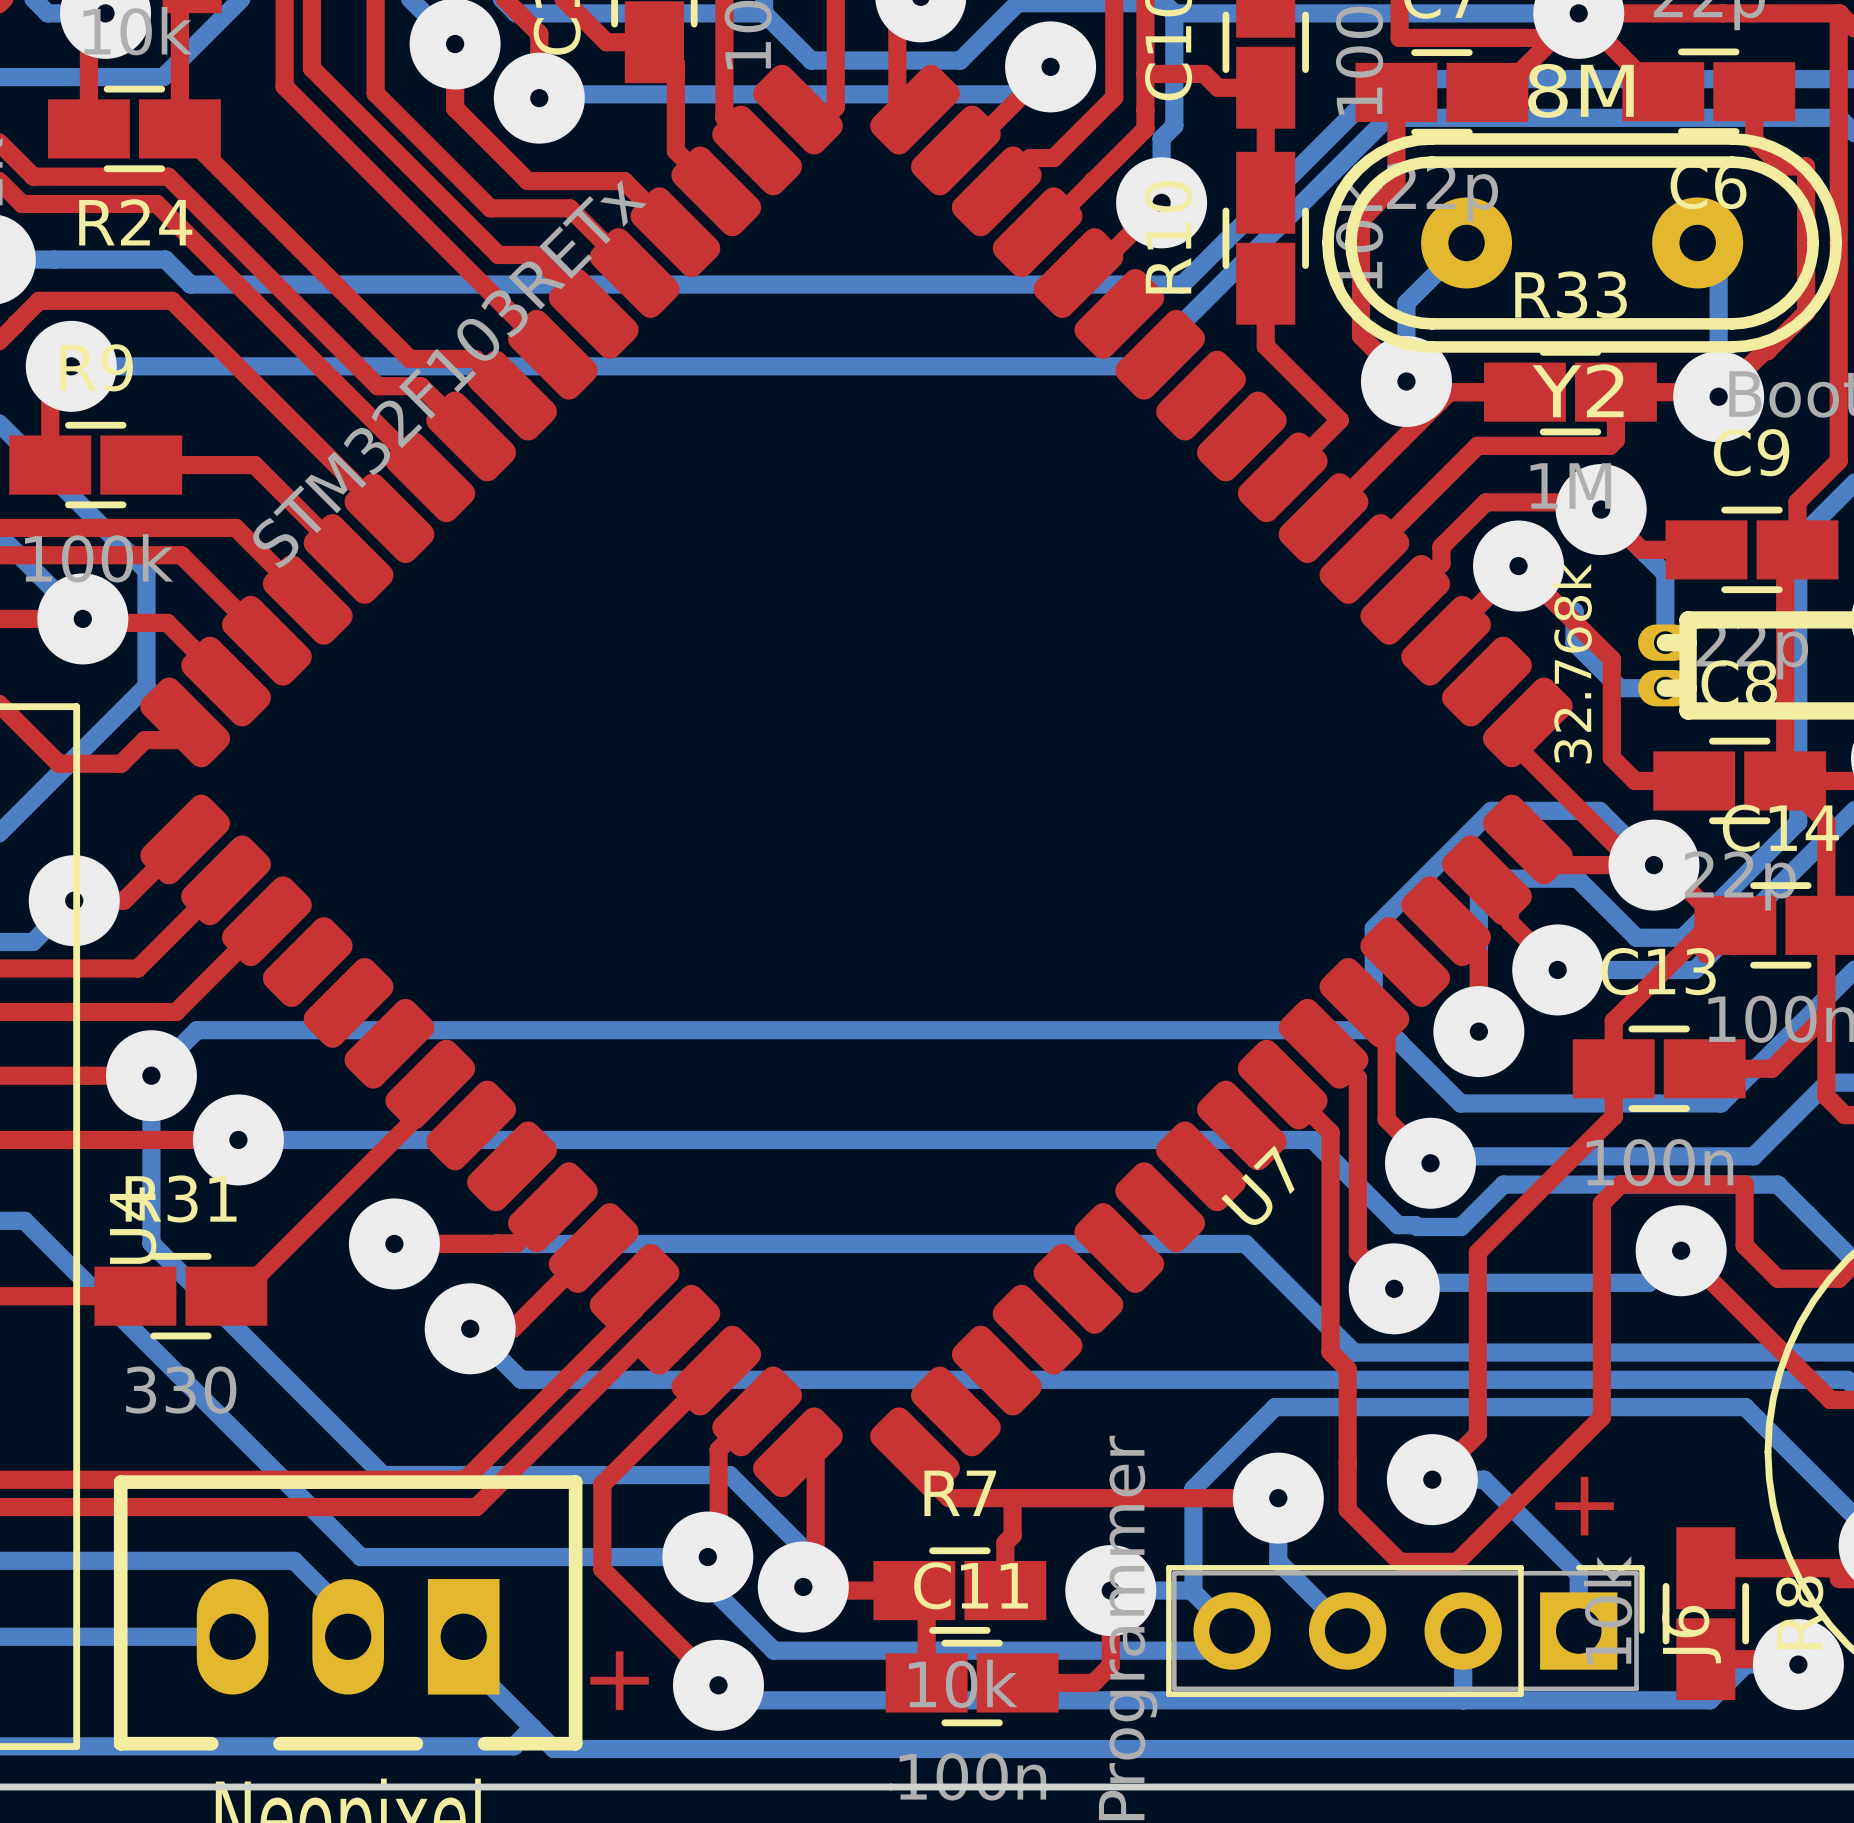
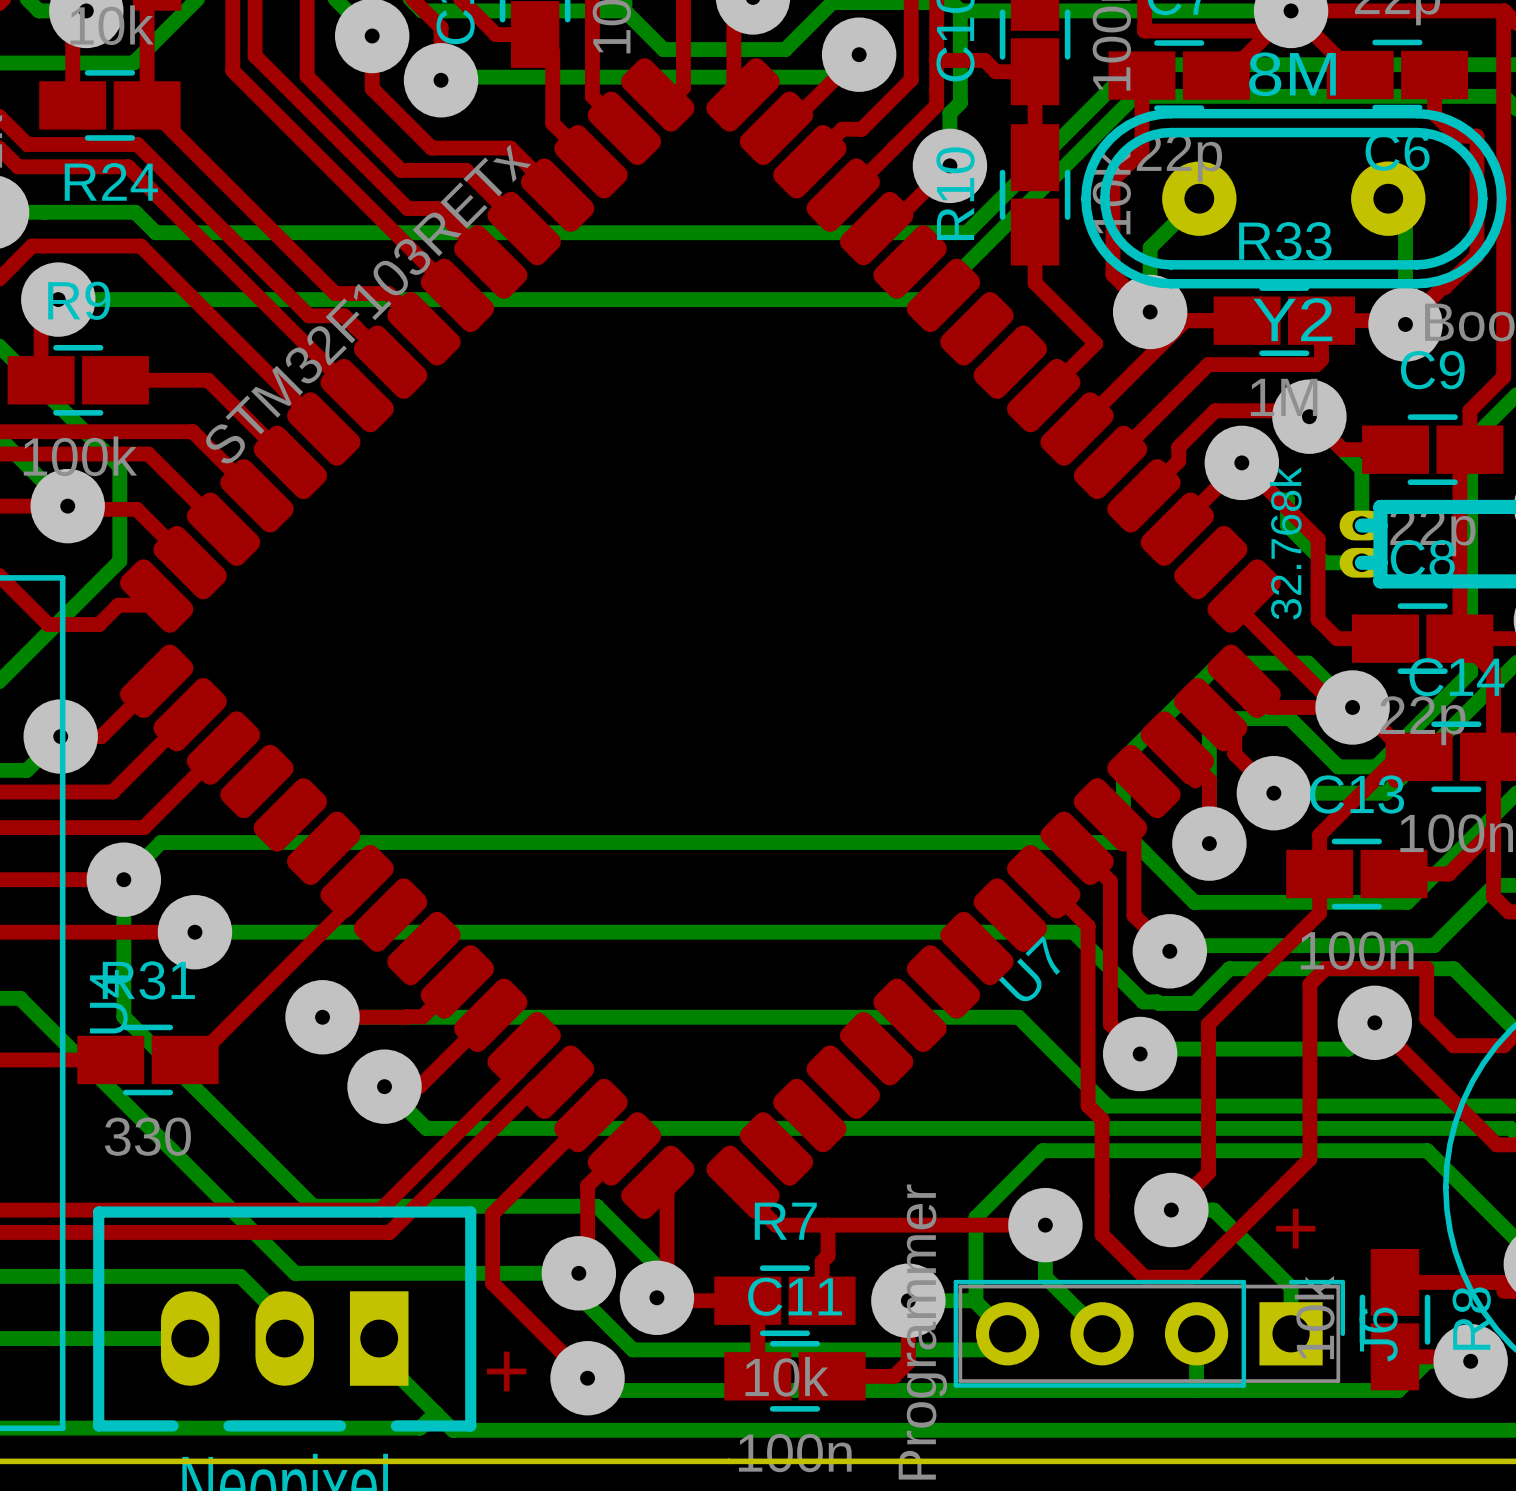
U7 footprint: [140, 64, 1573, 1498] -> [119, 58, 1281, 1220]

